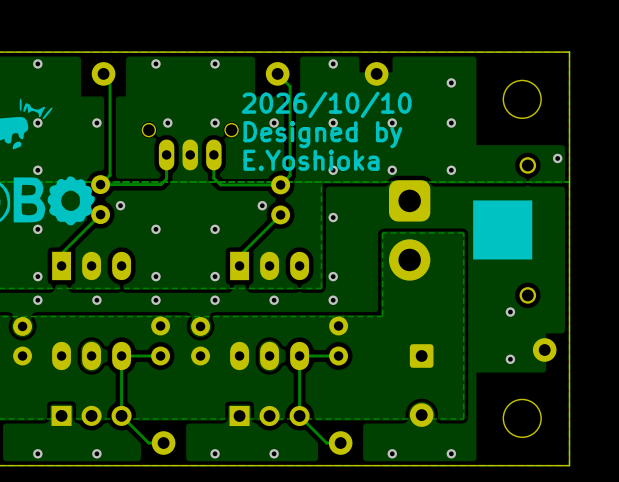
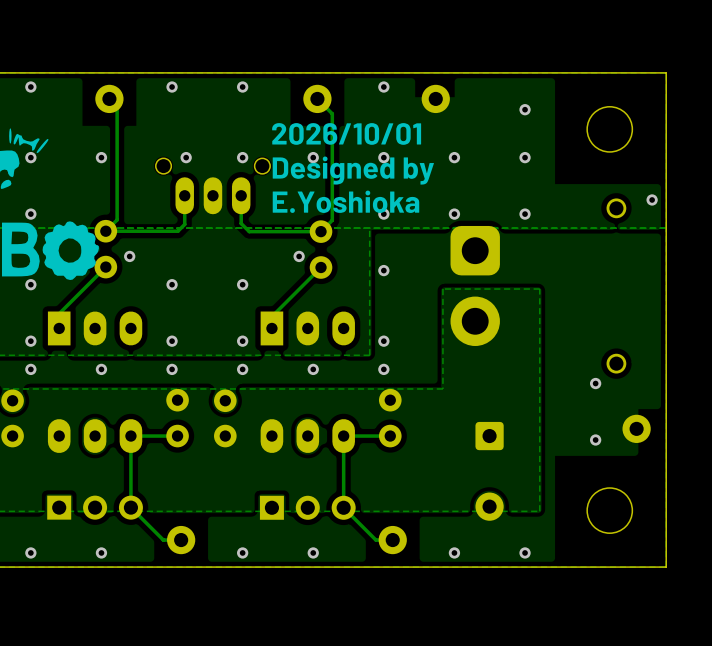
text: 2026/10/10 (326, 104) -> 2026/10/01 (346, 133)
drawing: [473, 200, 533, 260] -> none

